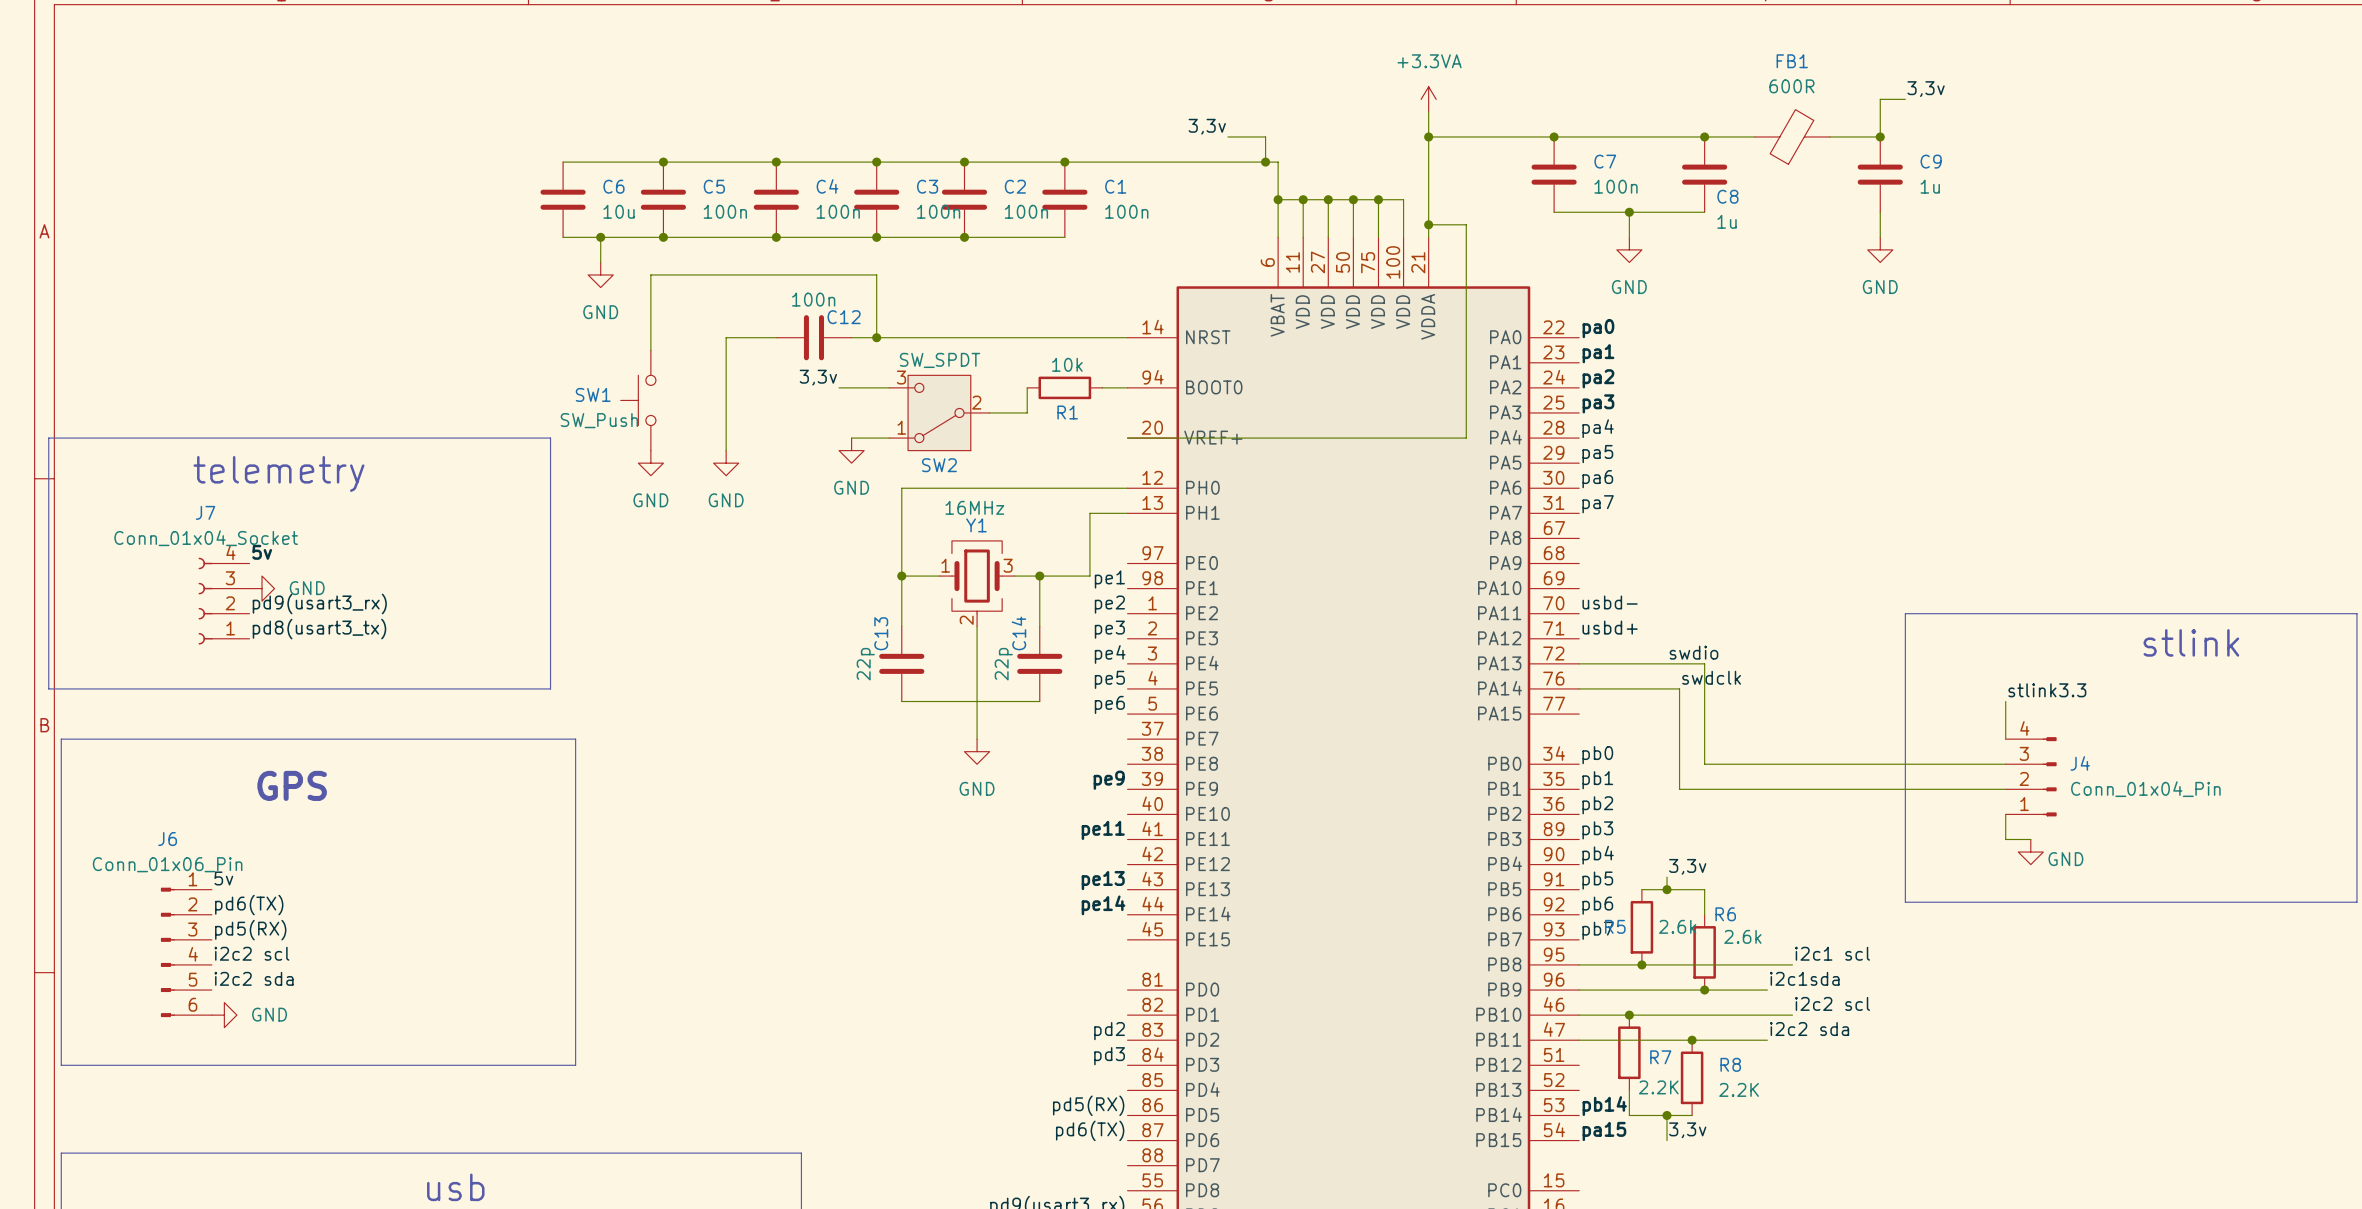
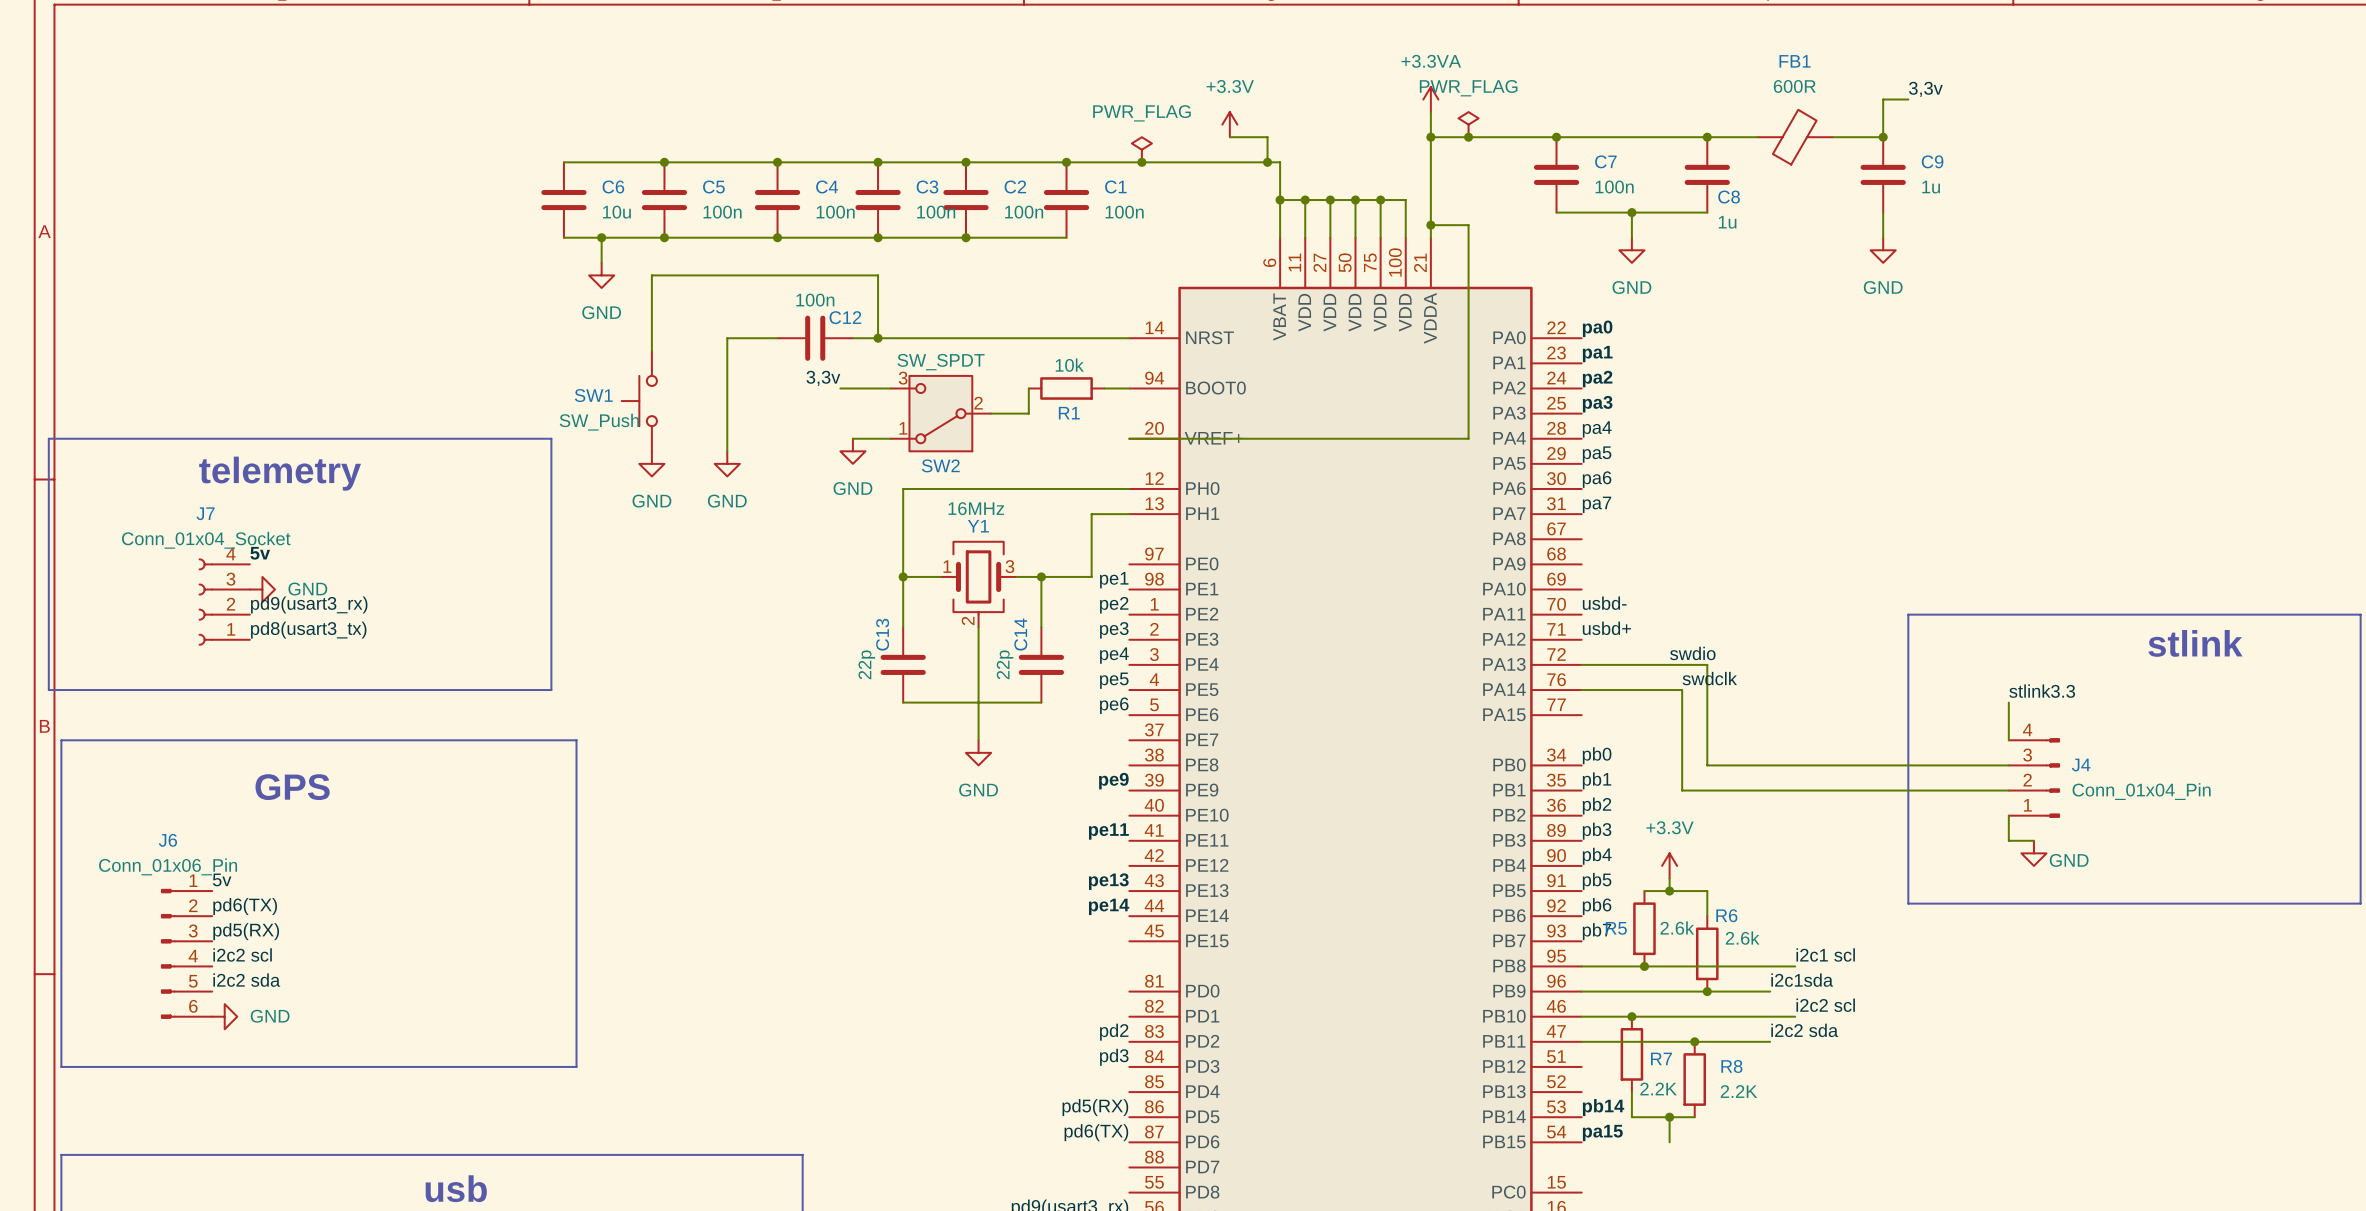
power symbol: none -> +3.3V (1229, 124)
power symbol: none -> PWR_FLAG (1468, 124)
label: 3,3v (1207, 126) -> none
junction: none -> (1468, 137)
power symbol: none -> PWR_FLAG (1141, 149)
junction: none -> (1141, 162)
power symbol: none -> +3.3V (1669, 865)
label: 3,3v (1687, 866) -> none
label: 3,3v (1687, 1130) -> none

